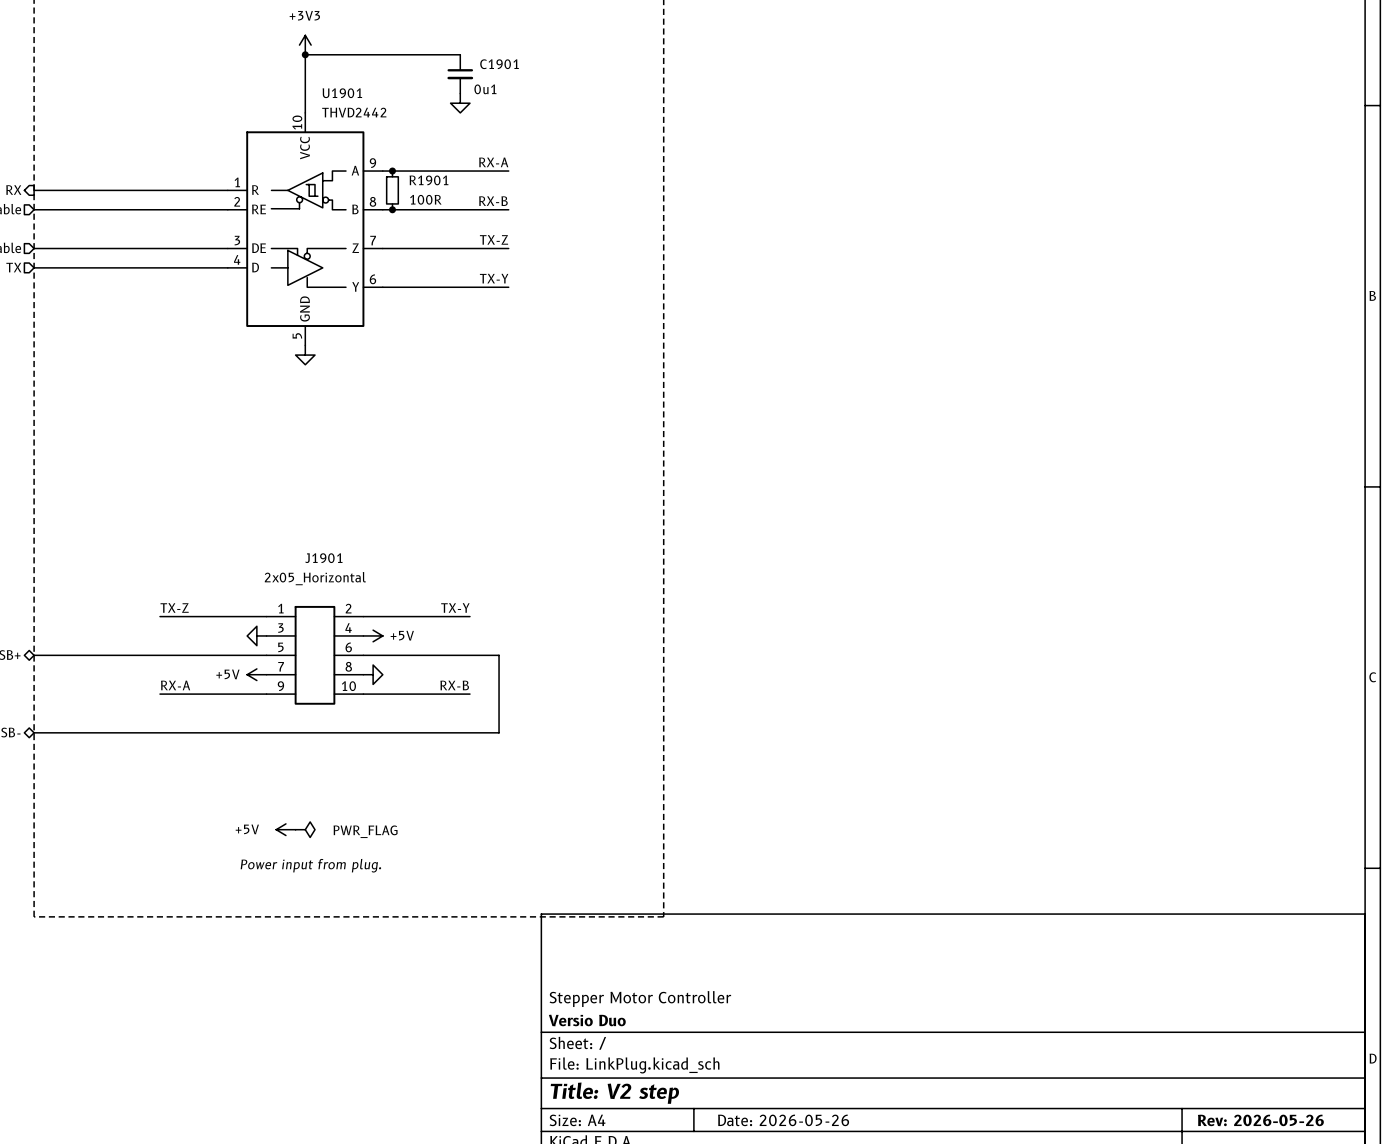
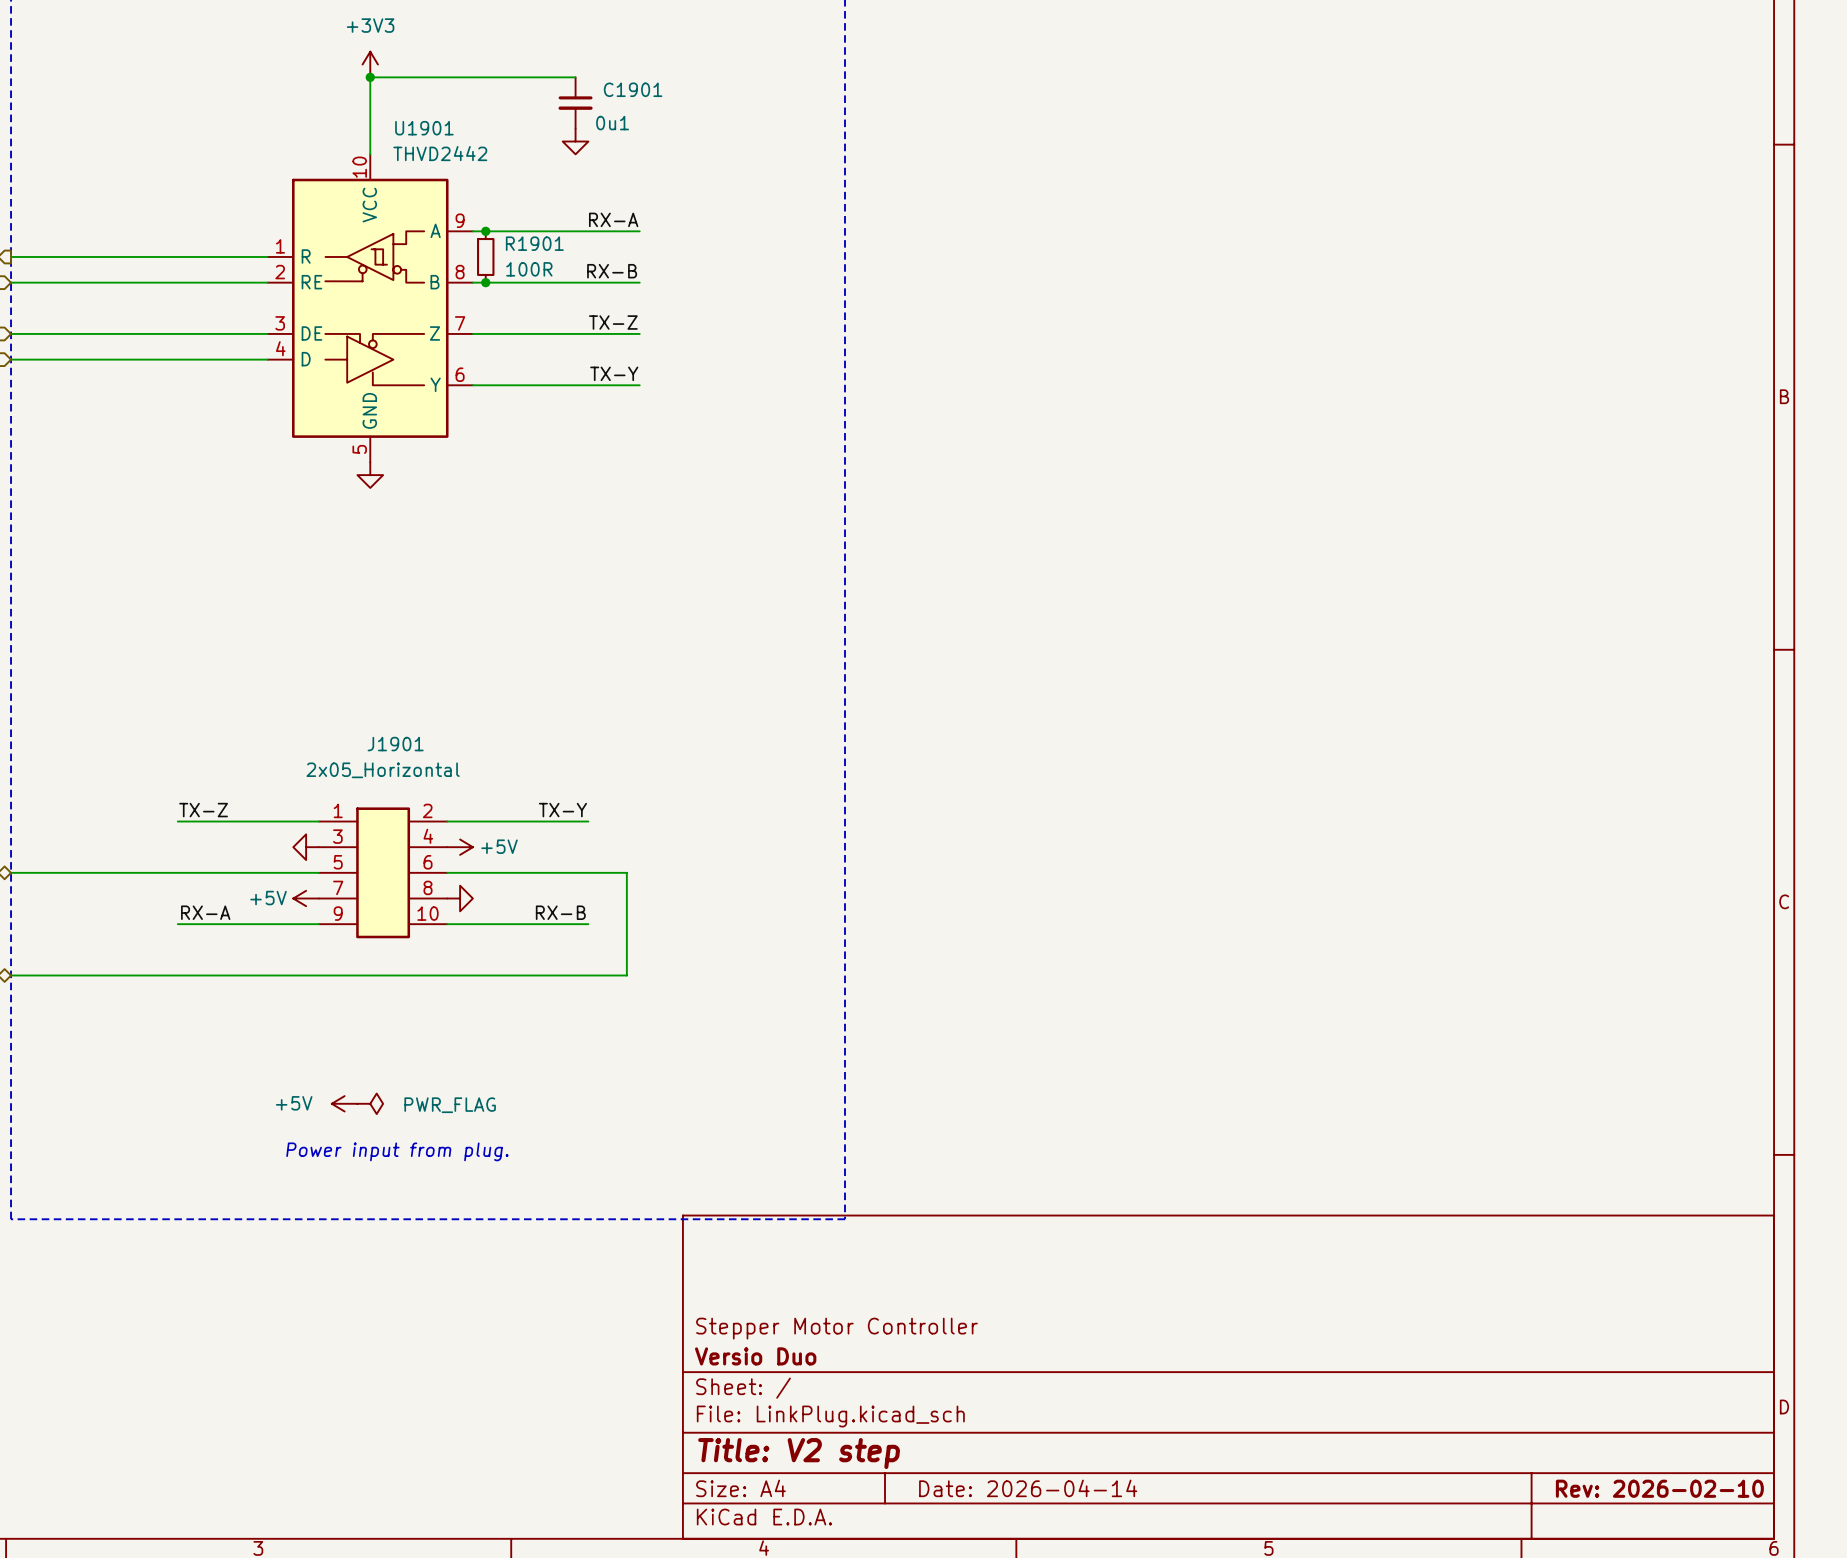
title block: Date: 2026-05-26 (783, 1120) -> Date: 2026-04-14 (1028, 1488)
title block: Rev: 2026-05-26 (1260, 1120) -> Rev: 2026-02-10 (1659, 1488)

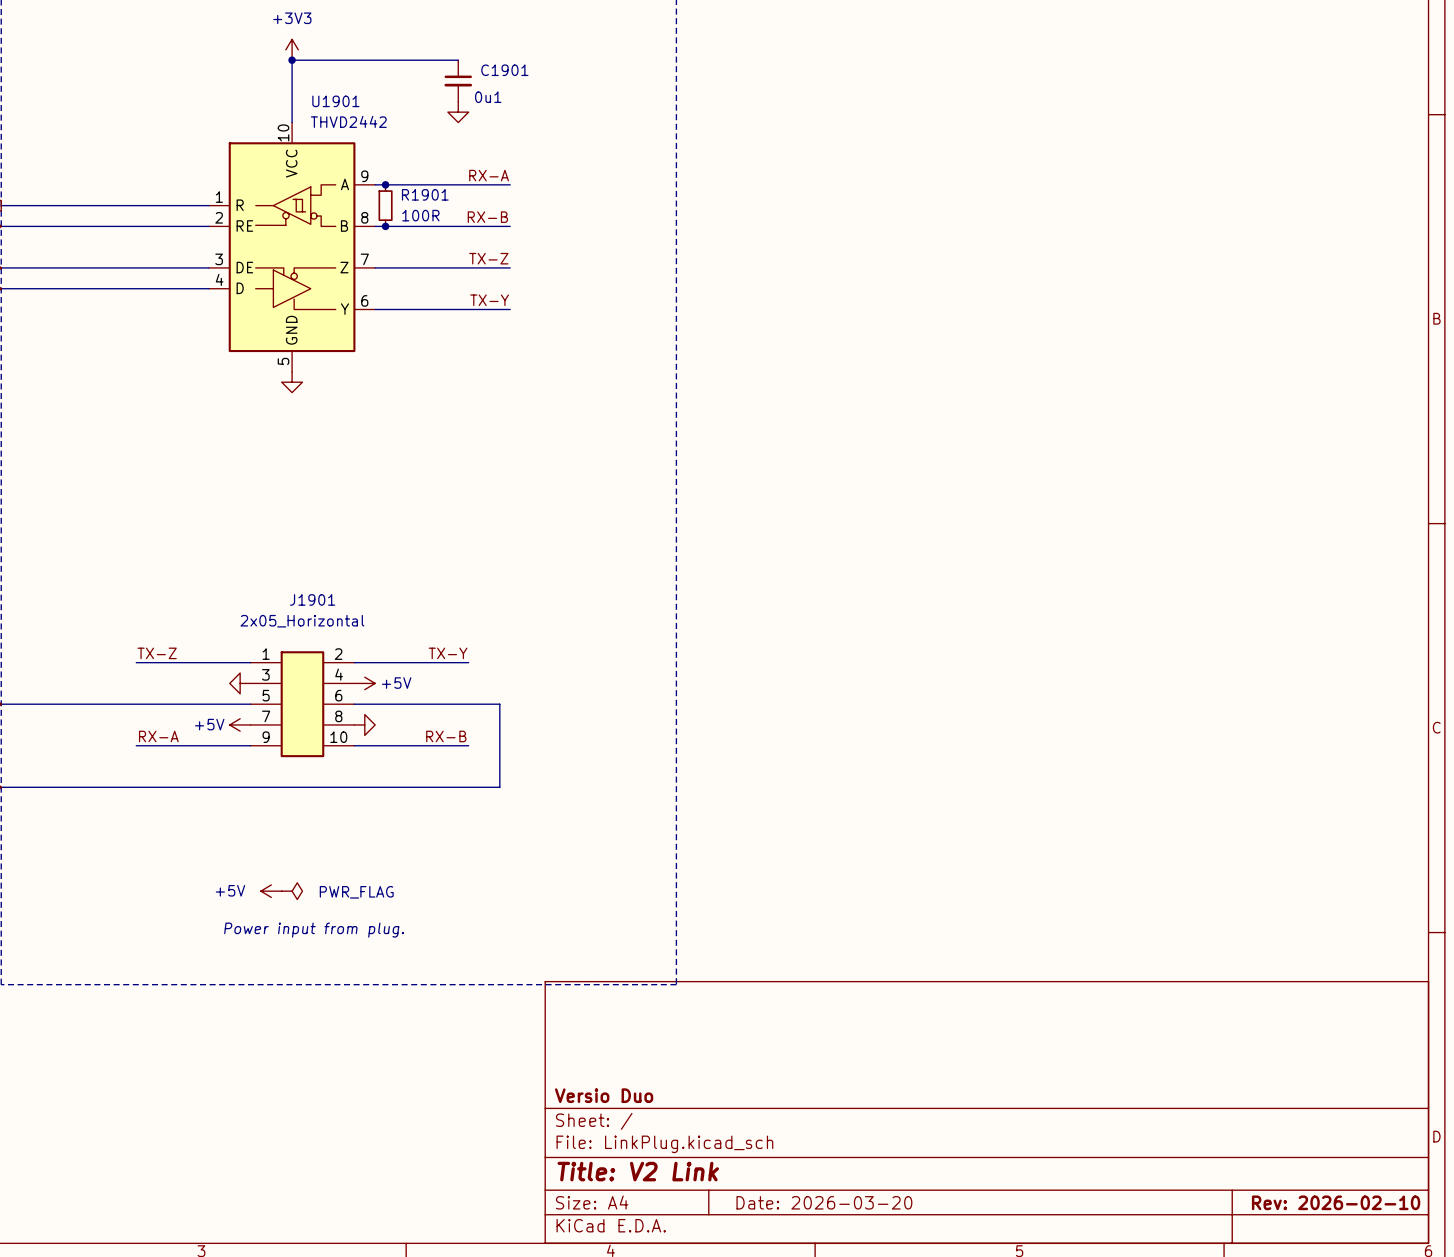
title block: Stepper Motor Controller (836, 1328) -> none
title block: Title: V2 step (799, 1453) -> Title: V2 Link (638, 1171)
title block: Date: 2026-04-14 (1028, 1488) -> Date: 2026-03-20 (824, 1202)

